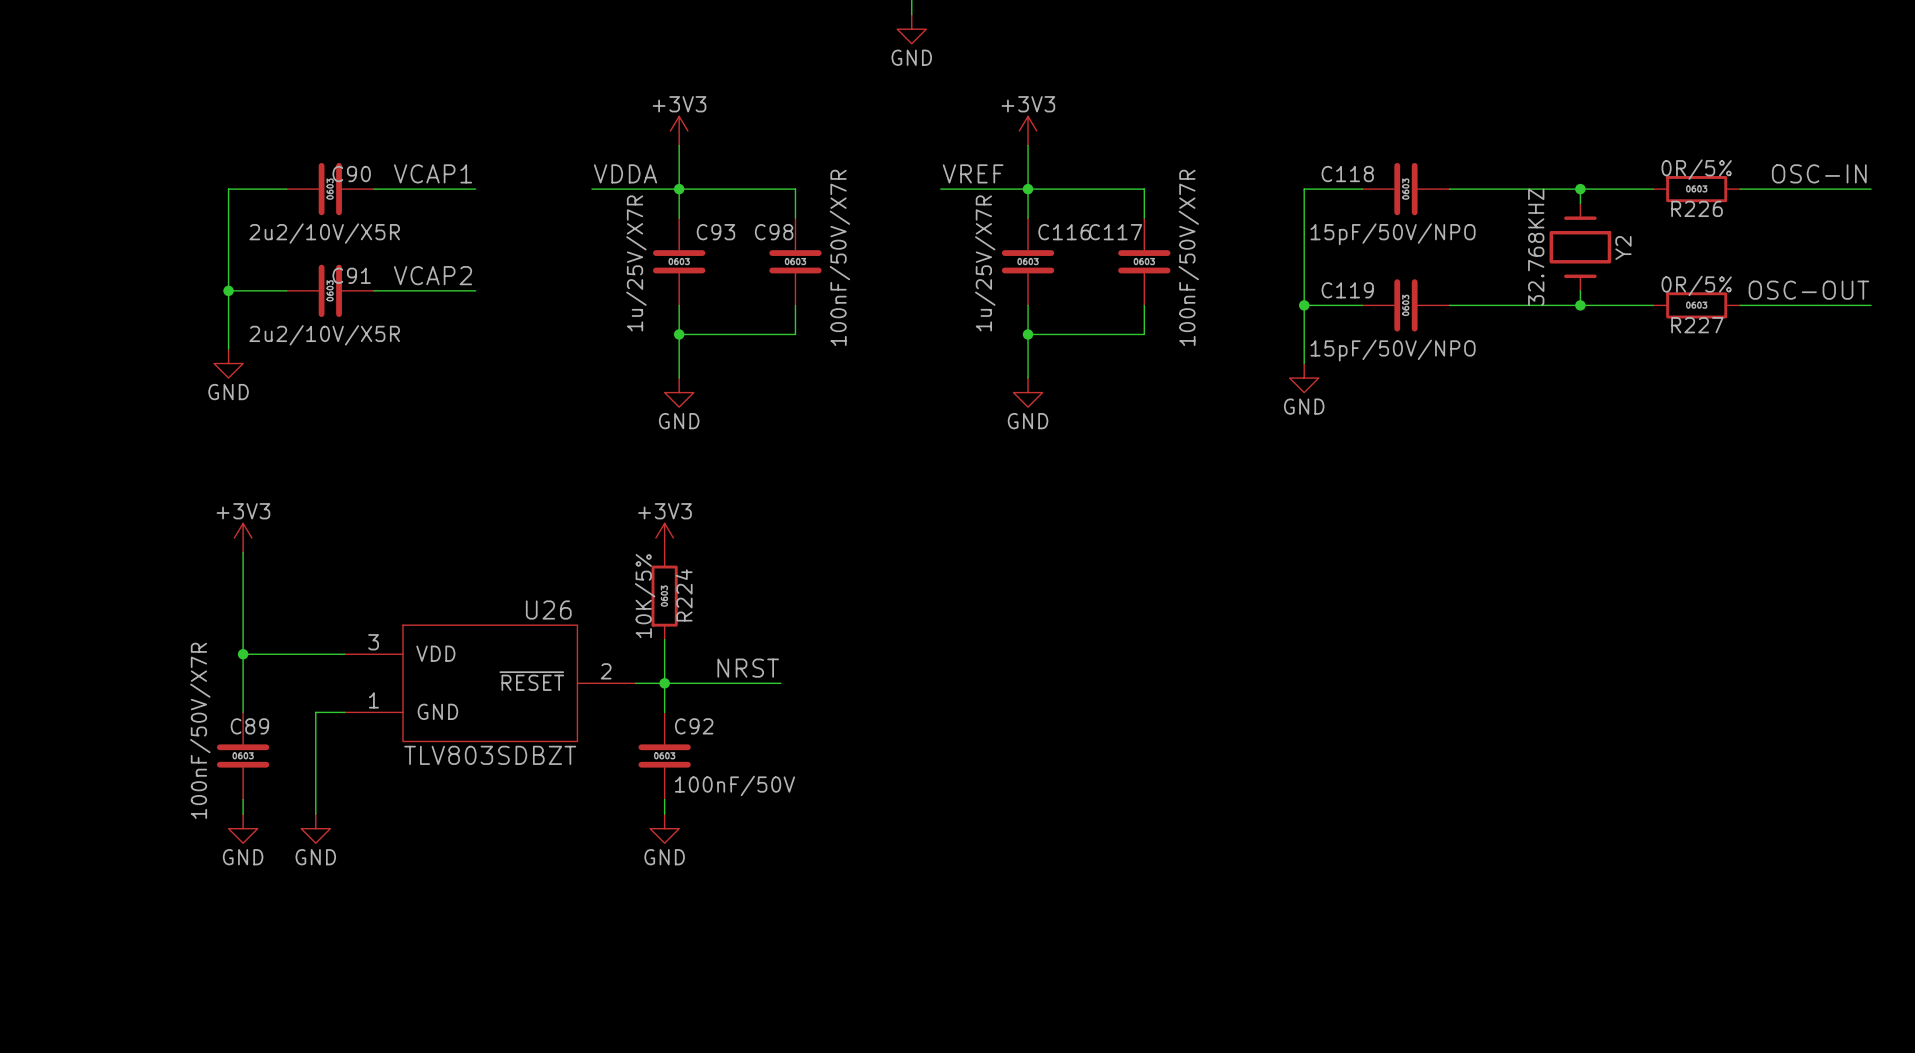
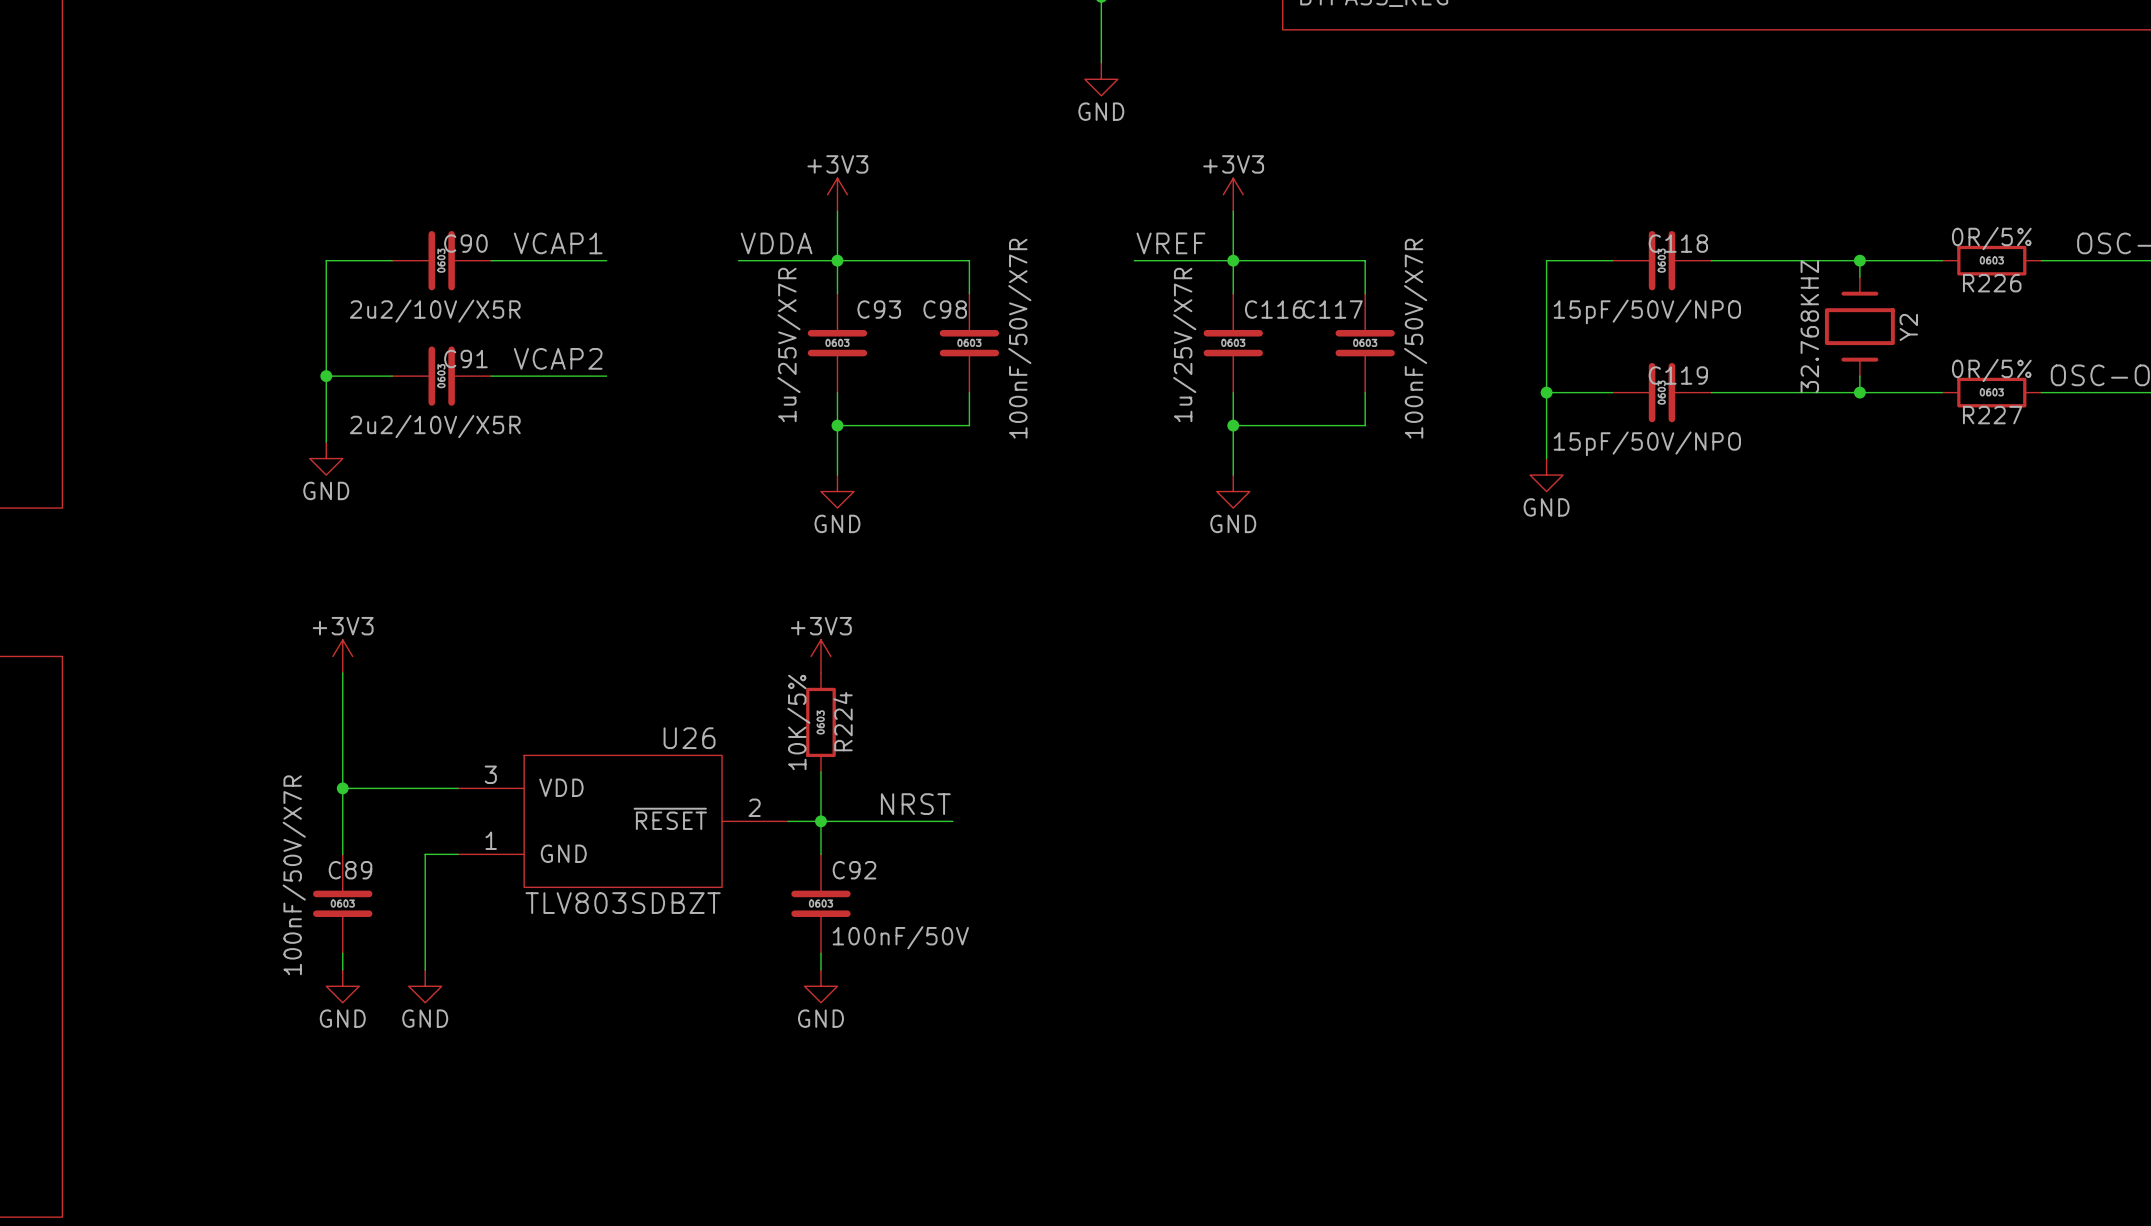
C118 name position: C118 (1347, 174) -> C118 (1678, 243)
C119 name position: C119 (1347, 290) -> C119 (1678, 375)

